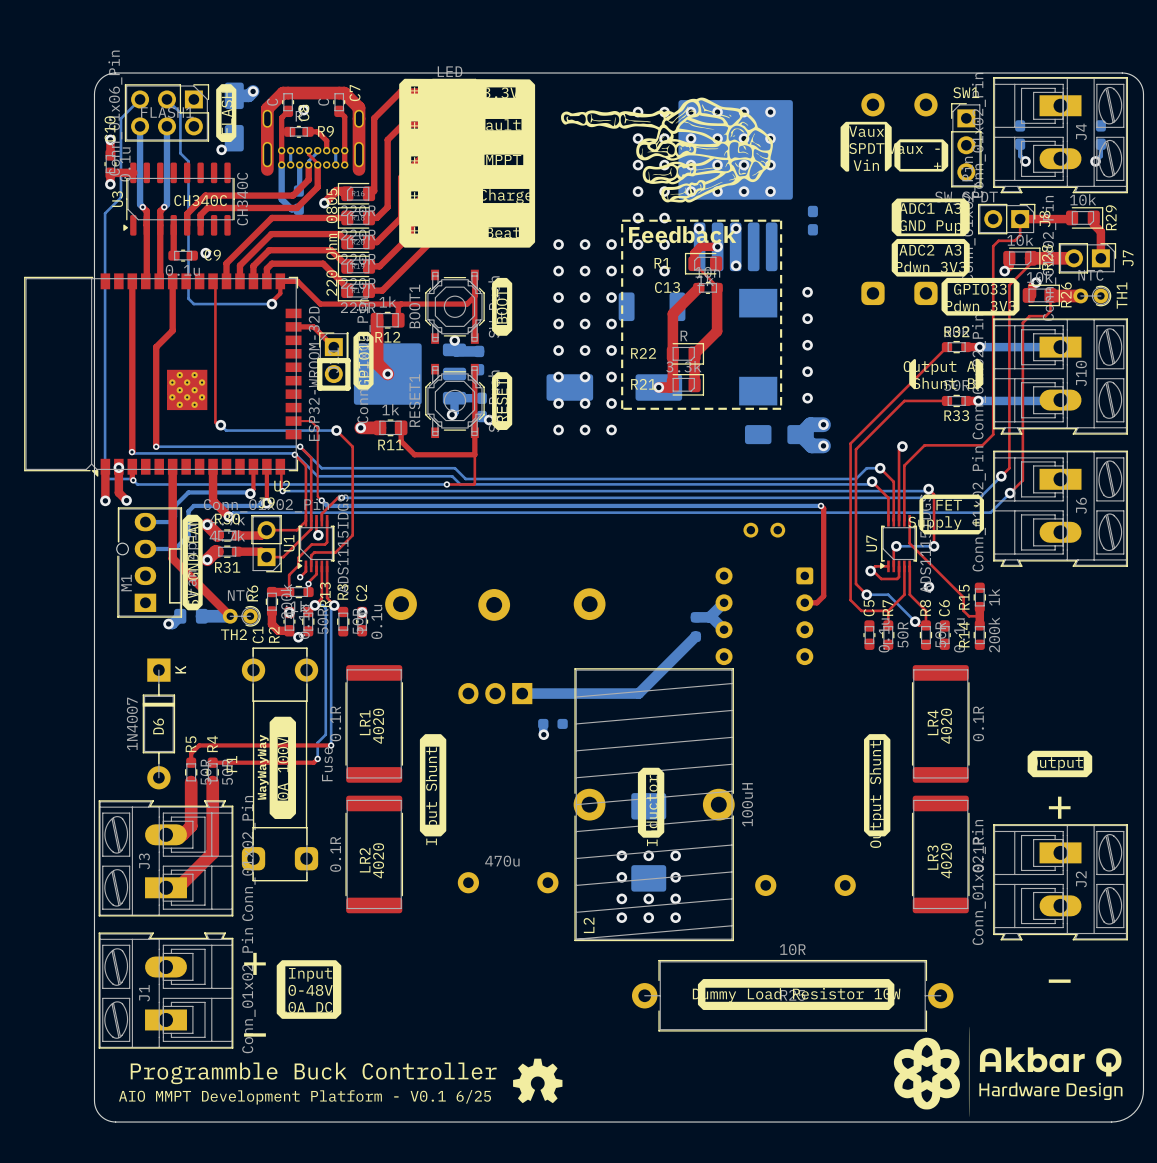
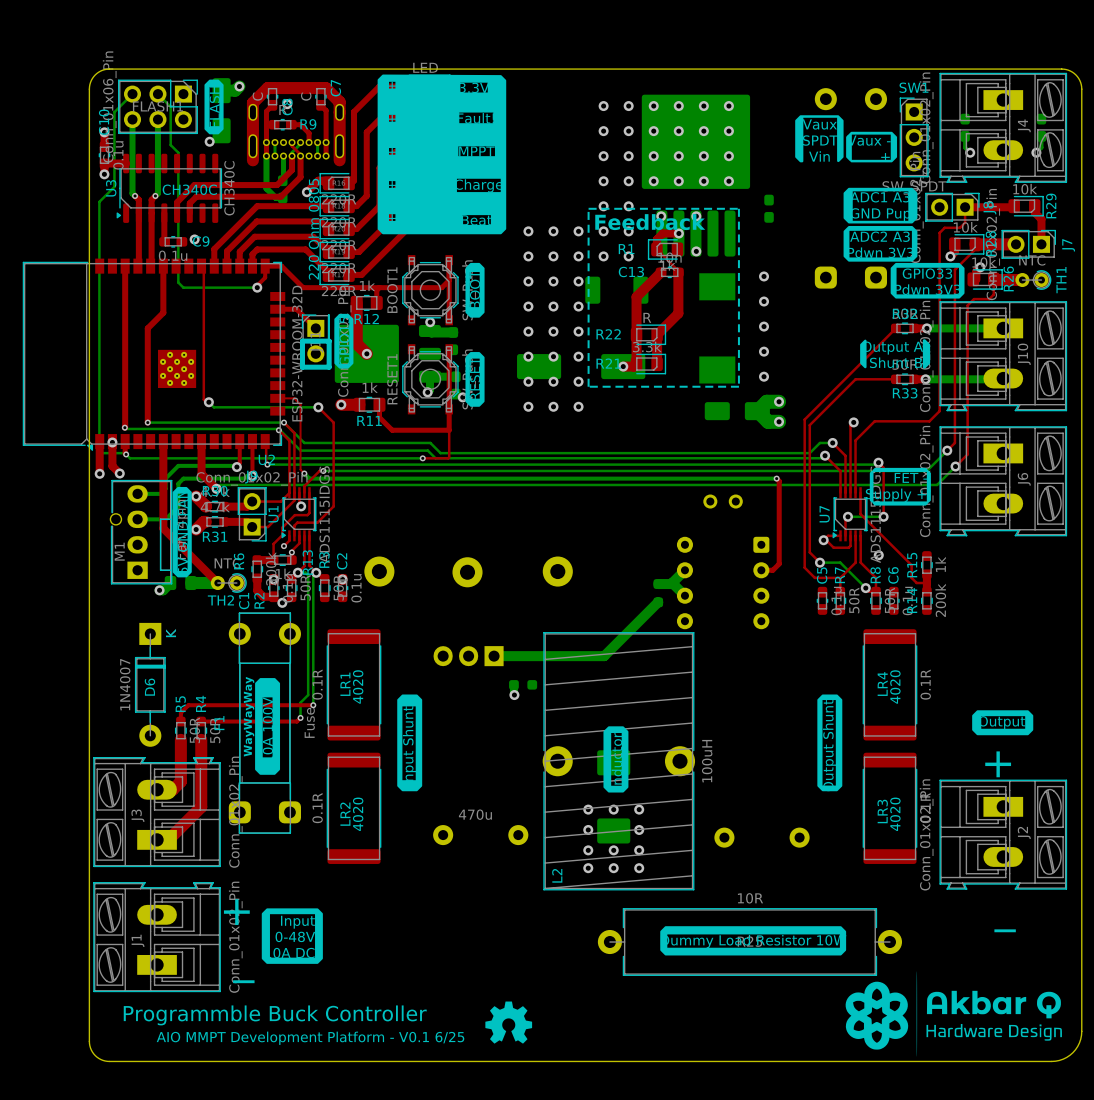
drawing: [561, 97, 773, 203] -> none

